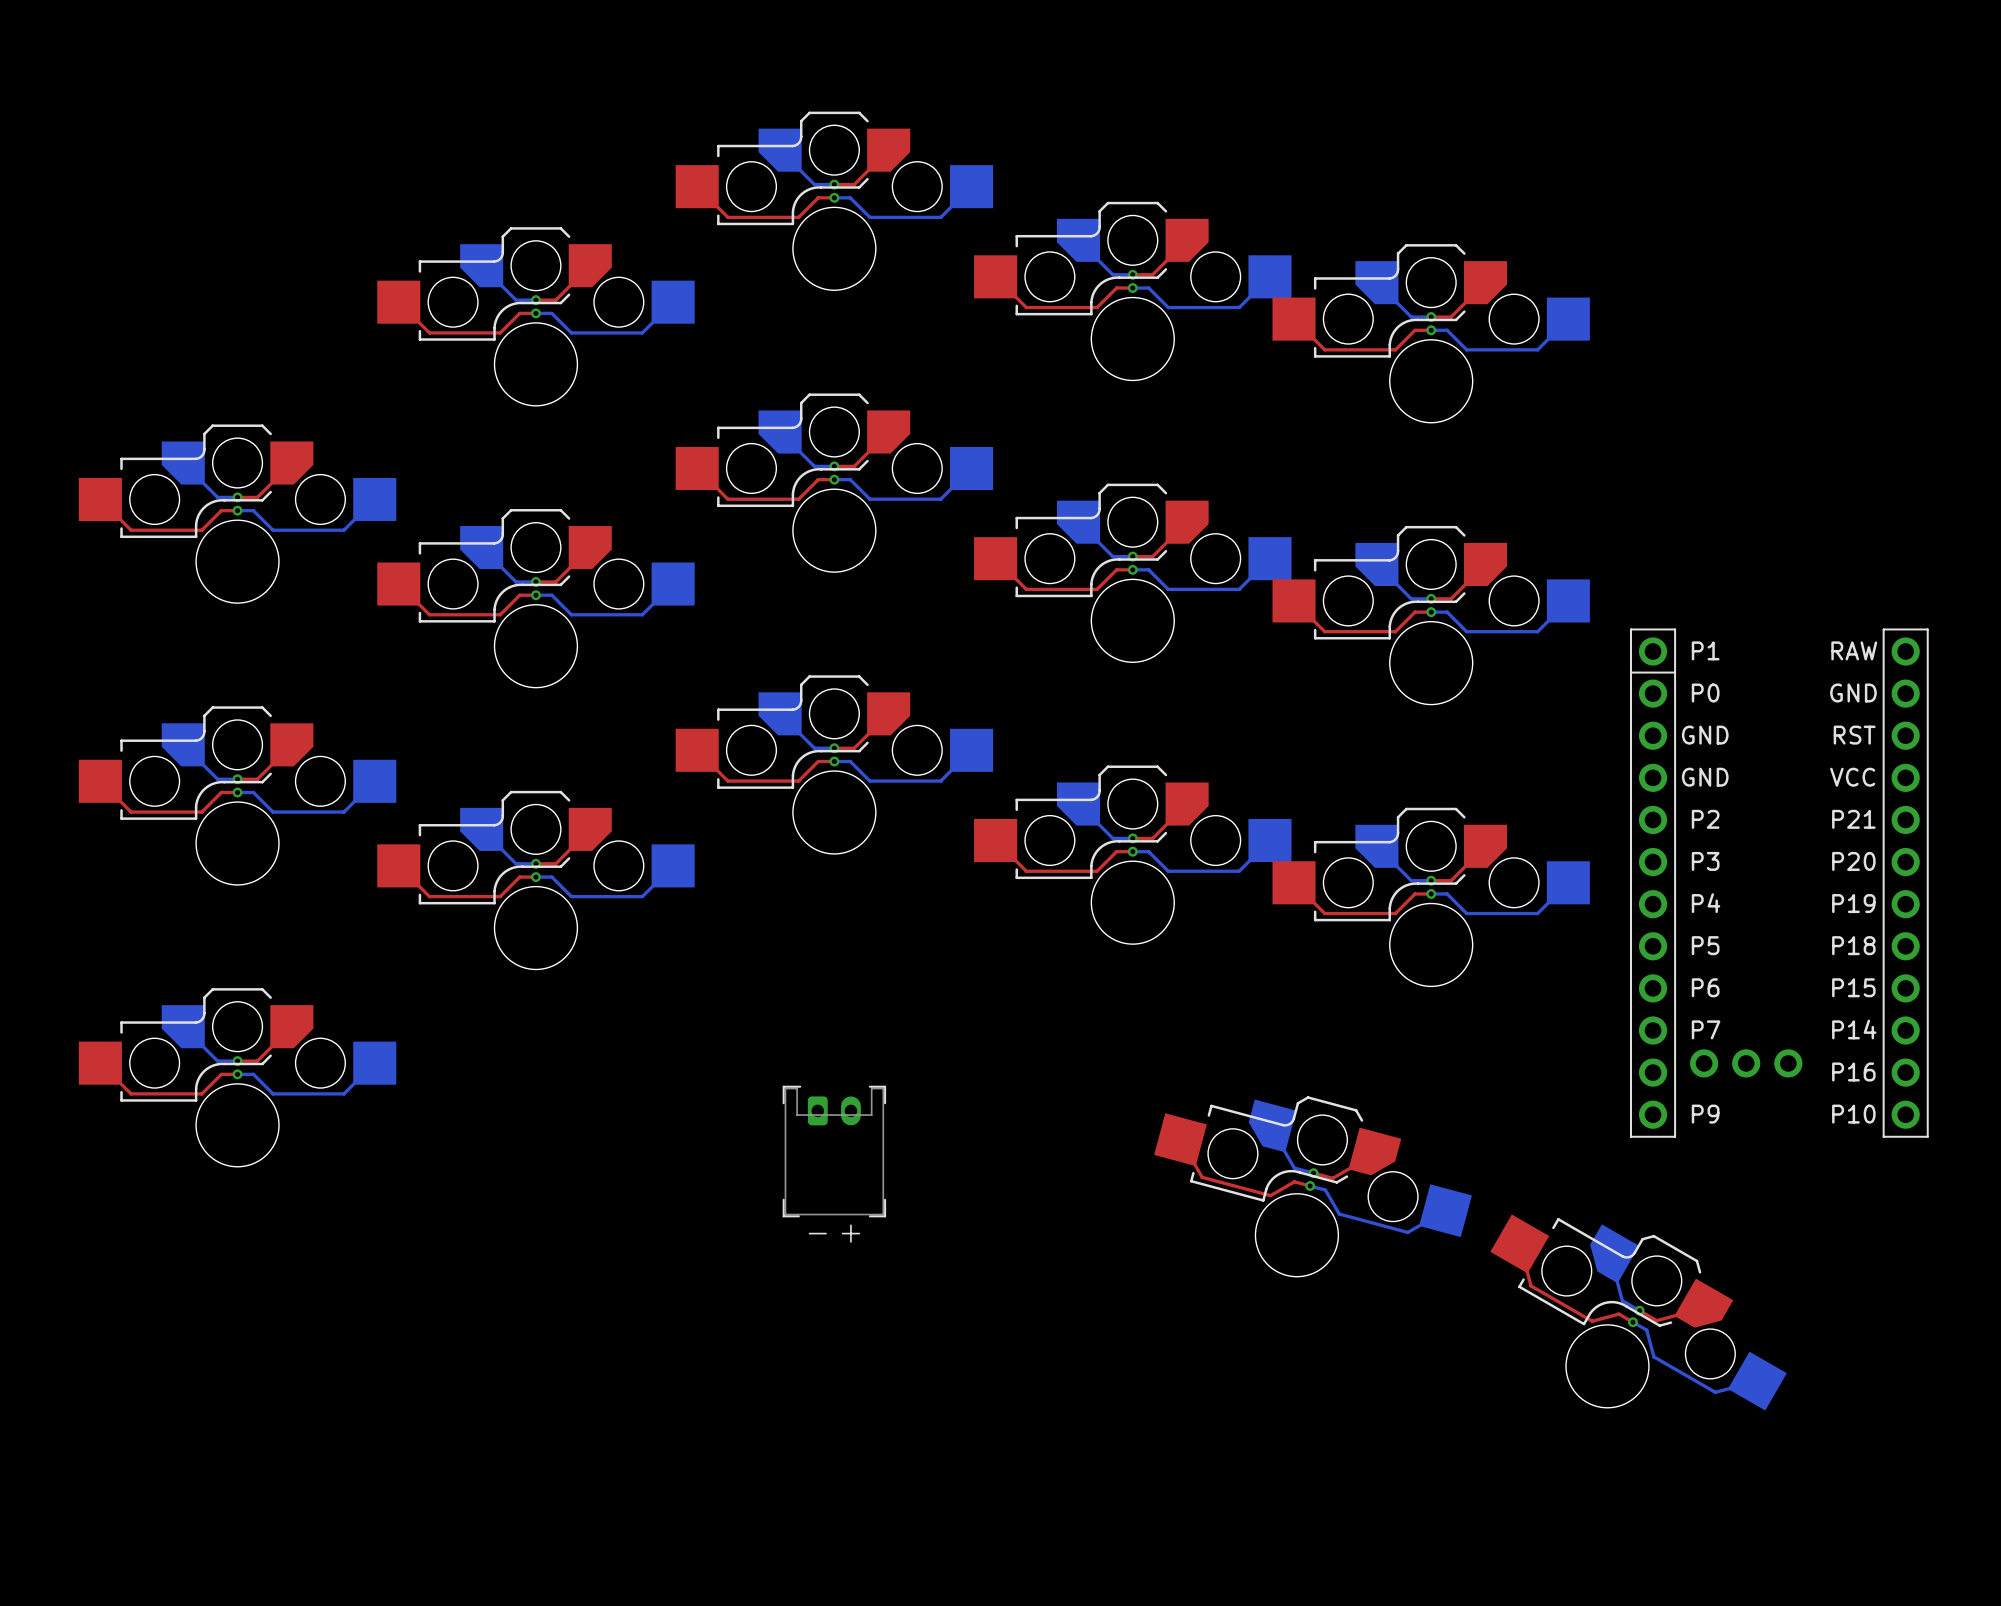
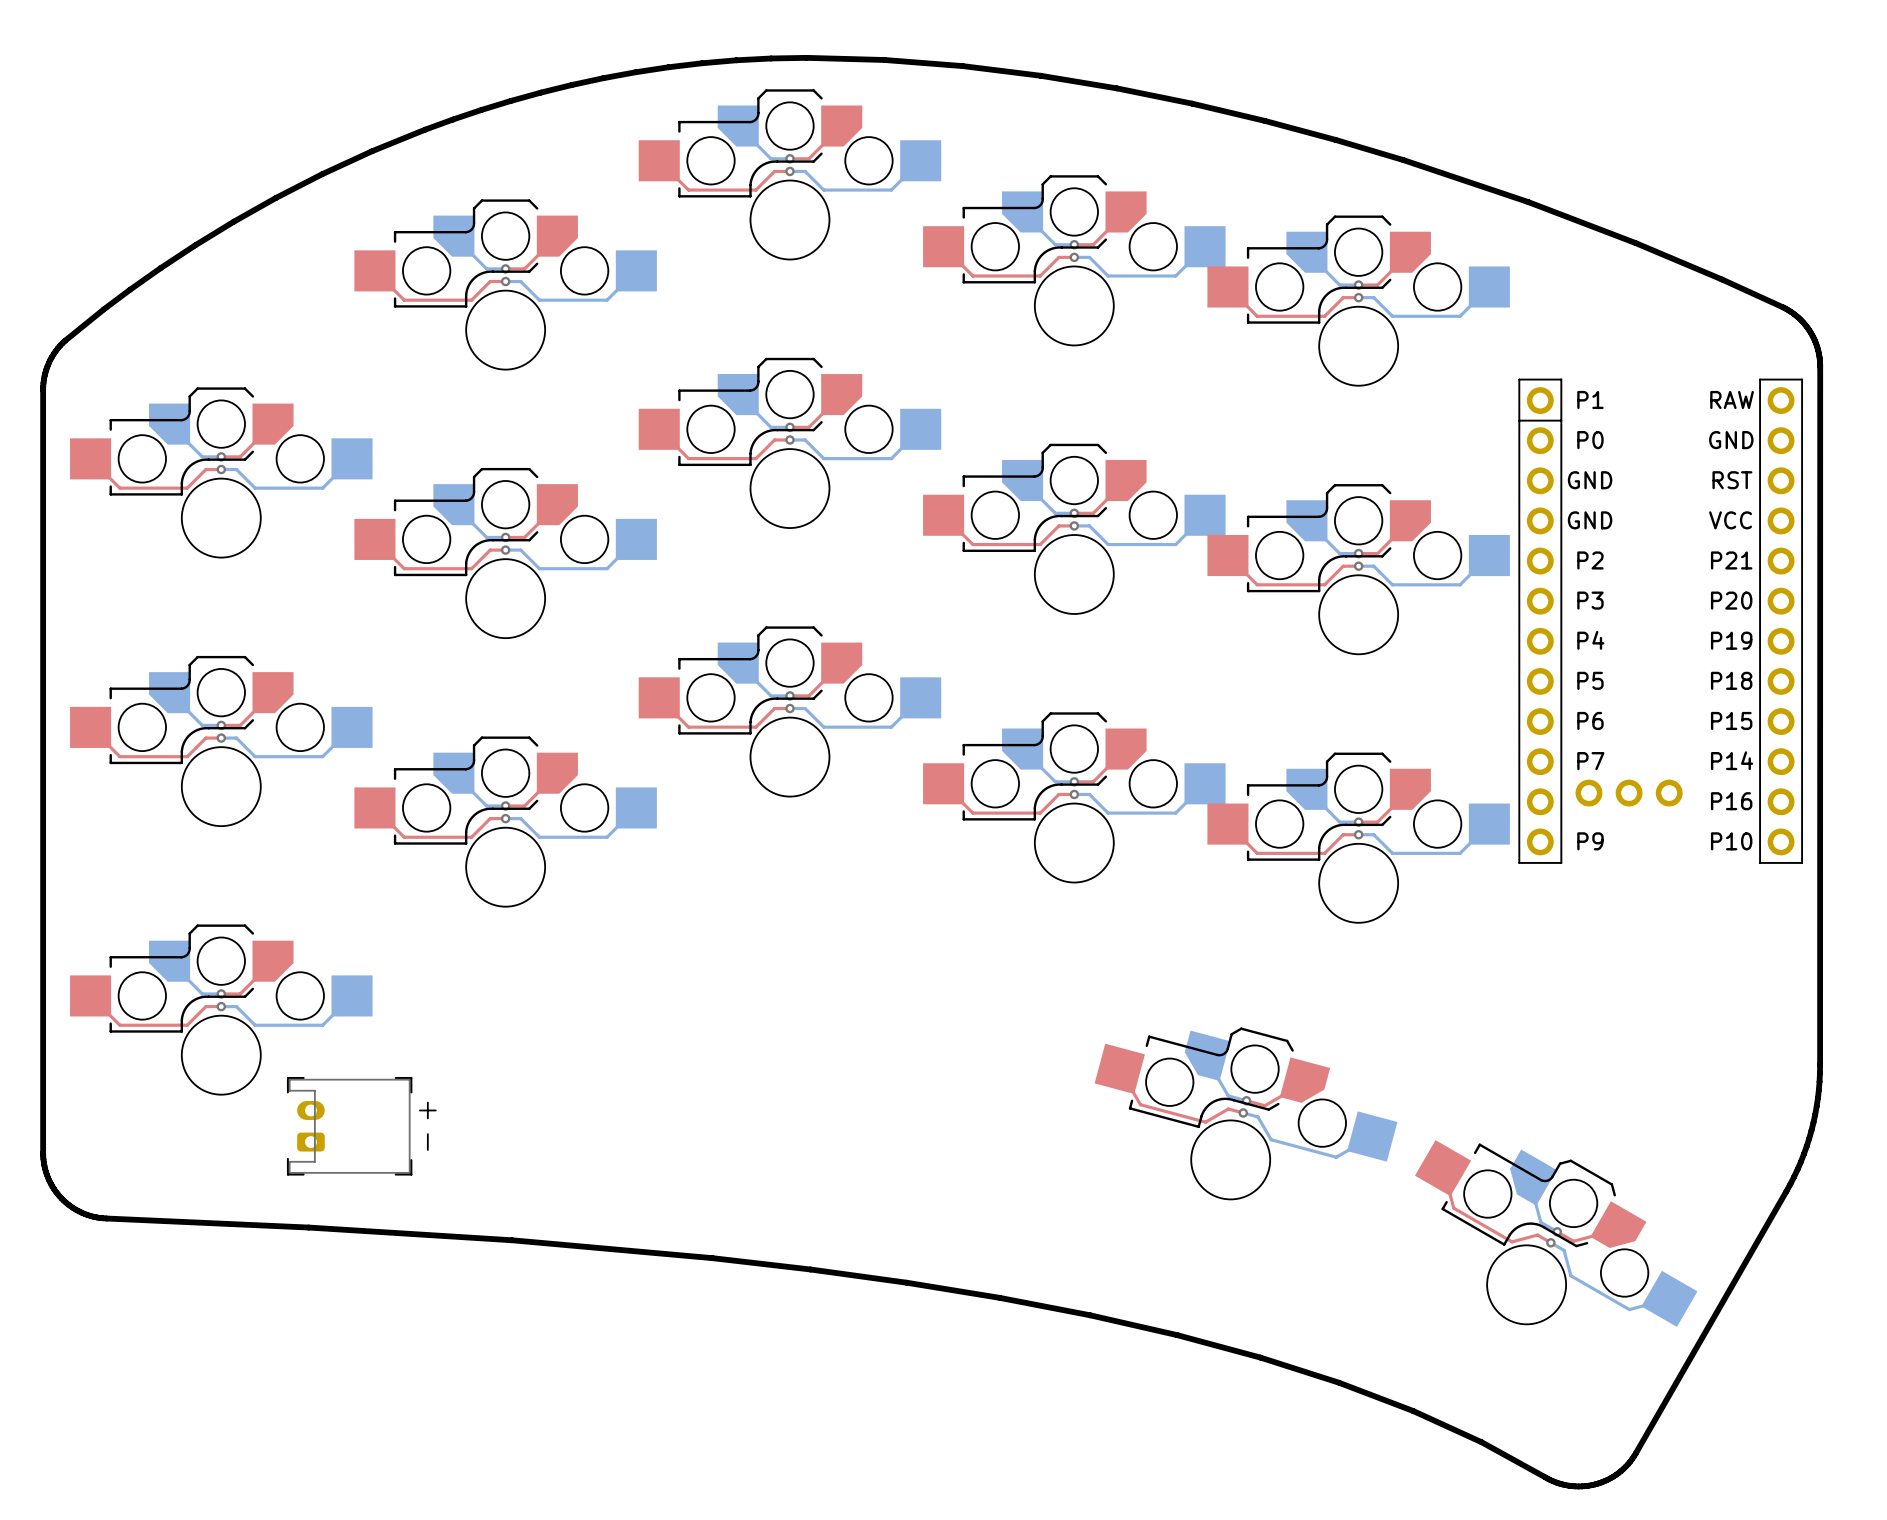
board edge: none -> (806, 57) (702, 63) (603, 78) (510, 100) (425, 129) (322, 174) (233, 221) (130, 289) (65, 340) (53, 353) (45, 372) (43, 389) (43, 1152) (45, 1168) (52, 1186) (61, 1198) (73, 1208) (87, 1214) (99, 1217) (308, 1227) (512, 1240) (712, 1258) (810, 1269) (999, 1297) (1090, 1315) (1177, 1335) (1260, 1357) (1339, 1382) (1412, 1410) (1481, 1442) (1559, 1483) (1585, 1486) (1610, 1478) (1623, 1468) (1634, 1456) (1786, 1191) (1803, 1154) (1816, 1106) (1820, 1065) (1820, 366) (1818, 350) (1811, 333) (1800, 319) (1785, 308) (1635, 243) (1528, 202) (1403, 160) (1335, 139) (1192, 103) (1040, 75) (962, 66) (884, 60) (806, 57)
part position: (1779, 883) -> (1660, 621)
part: (834, 1164) -> none
part: none -> (361, 1126)

